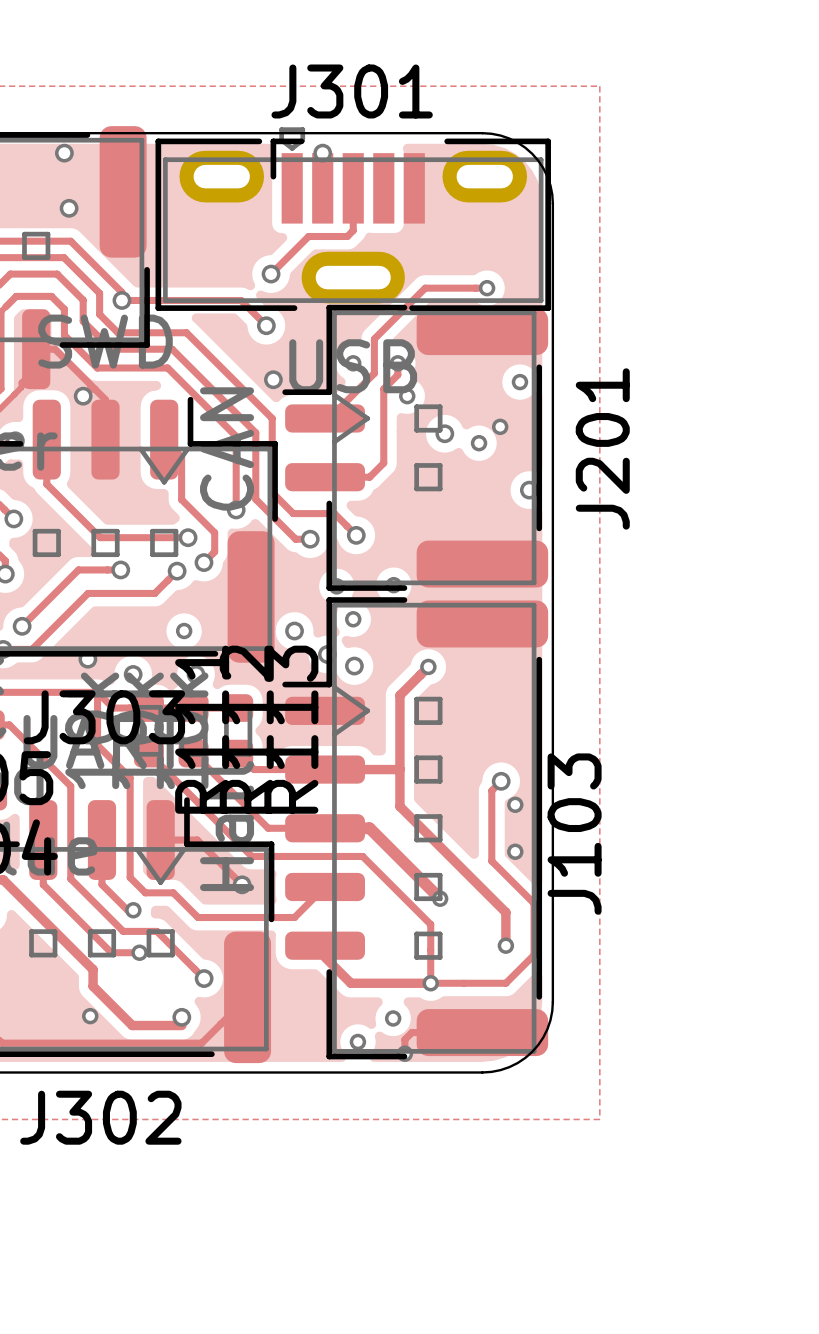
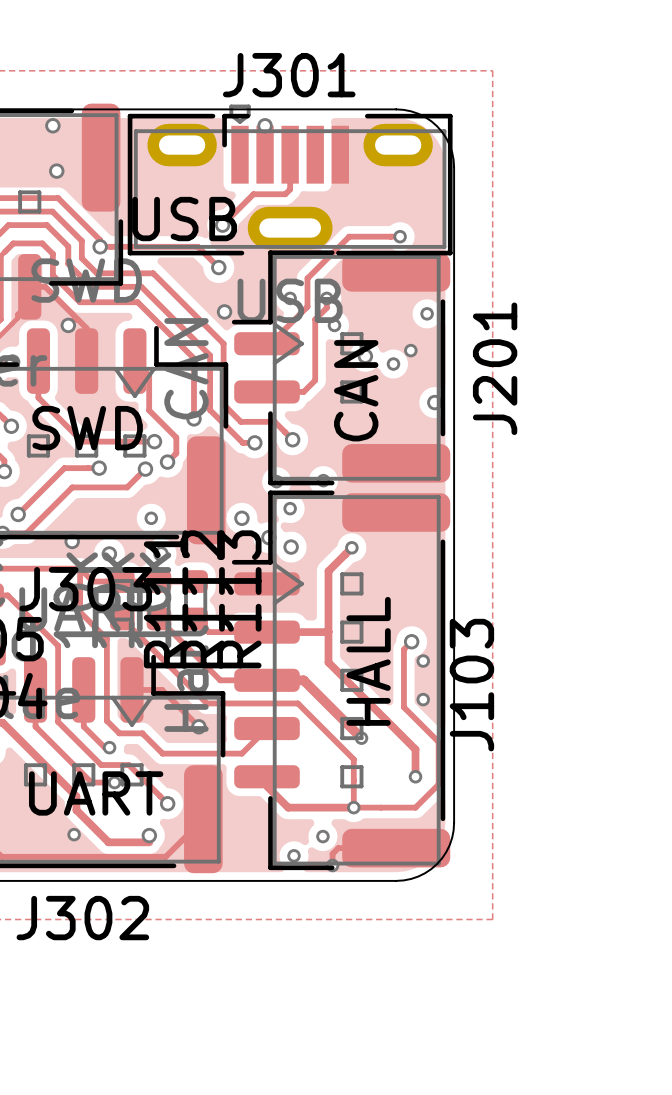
text: none -> USB (184, 219)
text: none -> CAN (356, 390)
text: none -> SWD (87, 428)
text: none -> HALL (368, 661)
text: none -> UART (96, 793)

